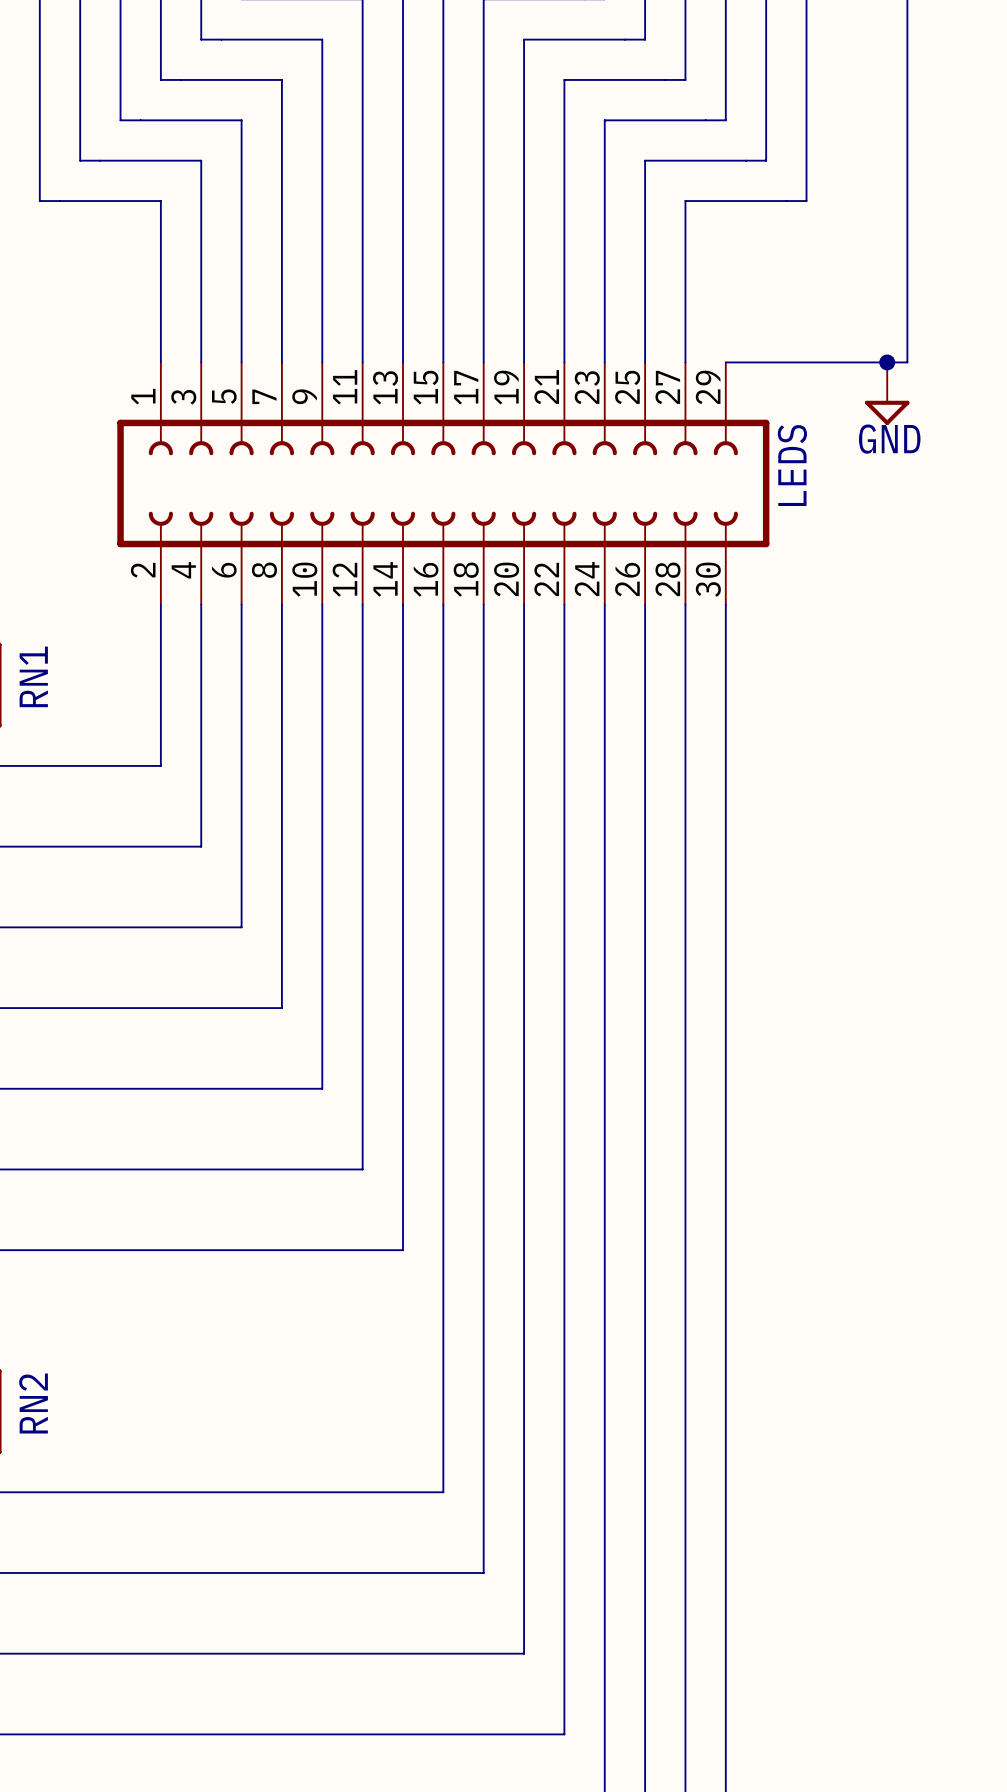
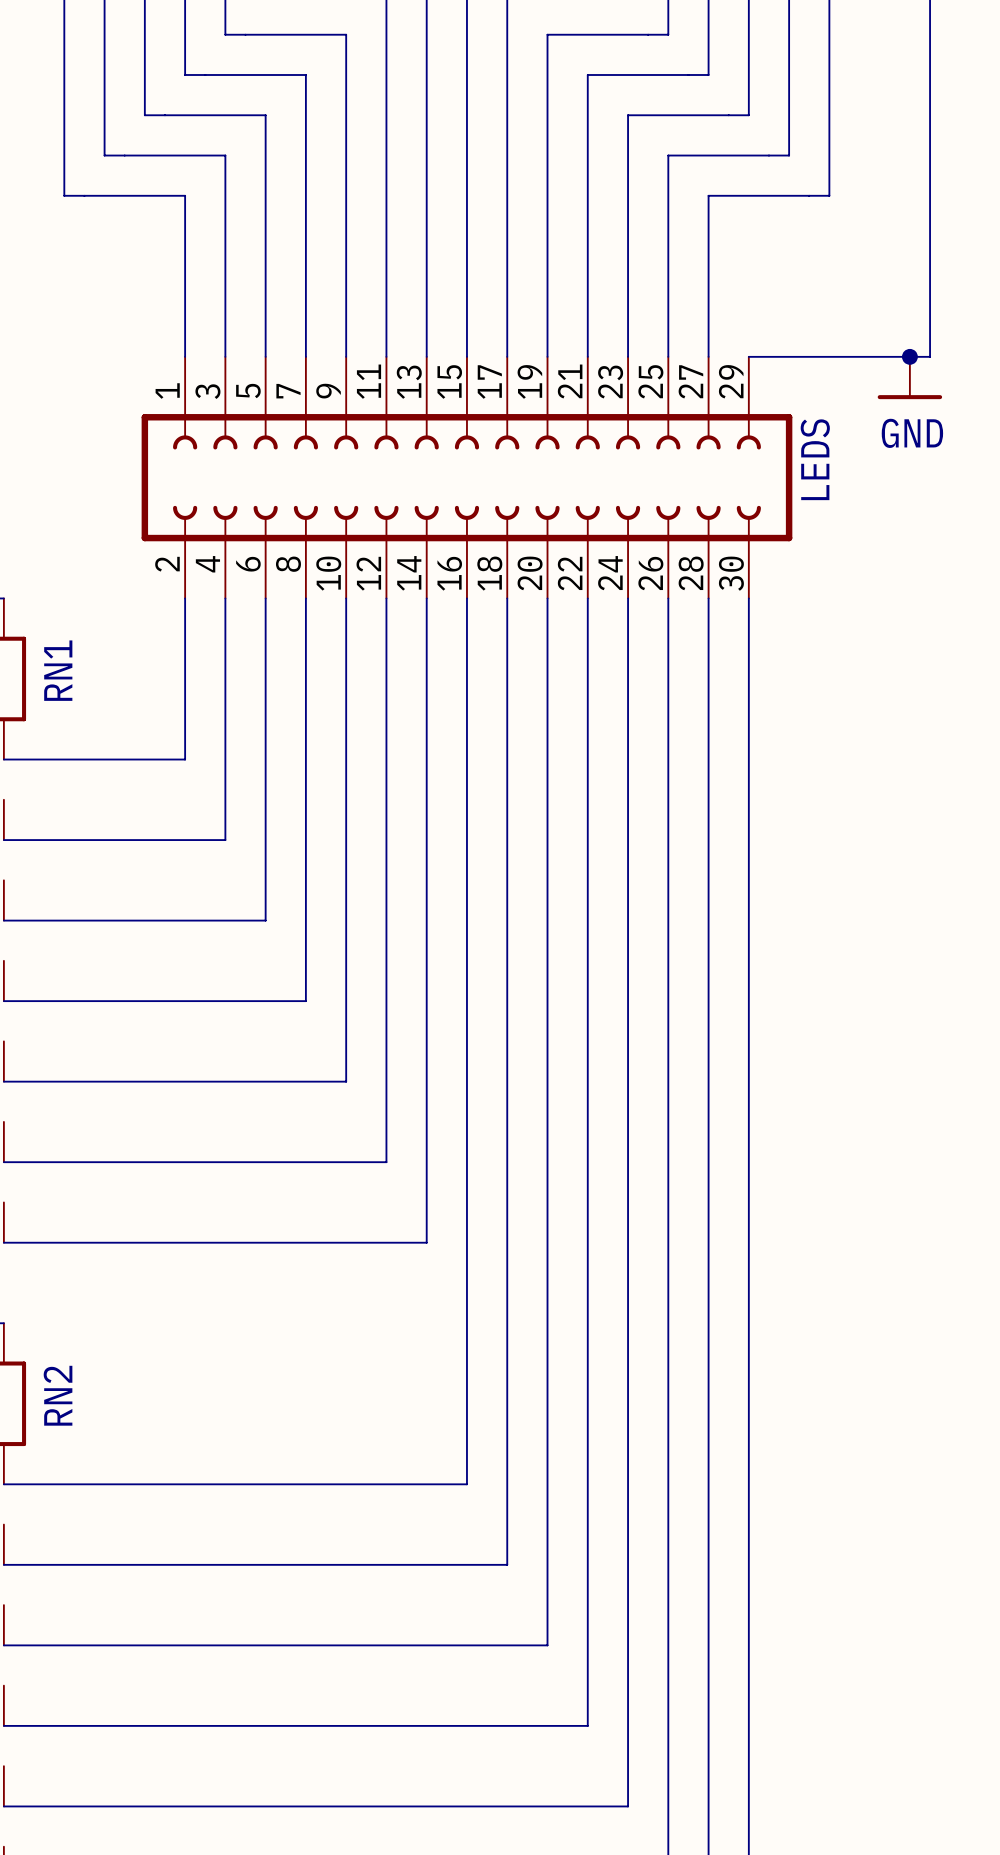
power symbol shape: [865, 362, 910, 425] -> [877, 356, 943, 400]

